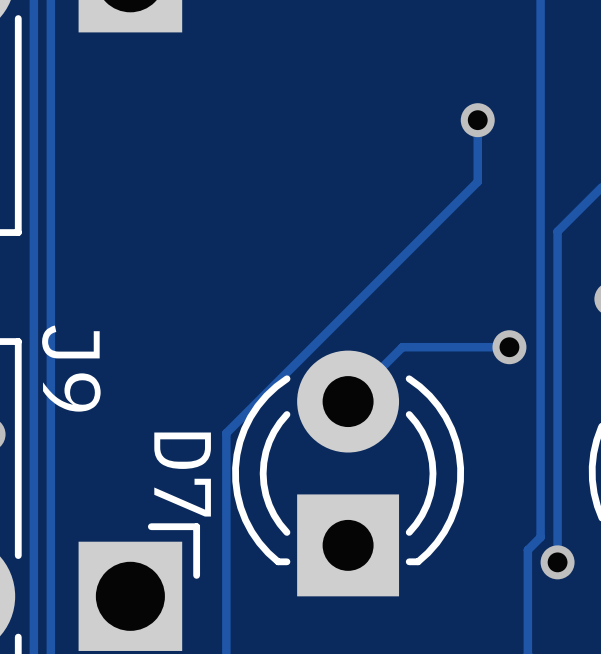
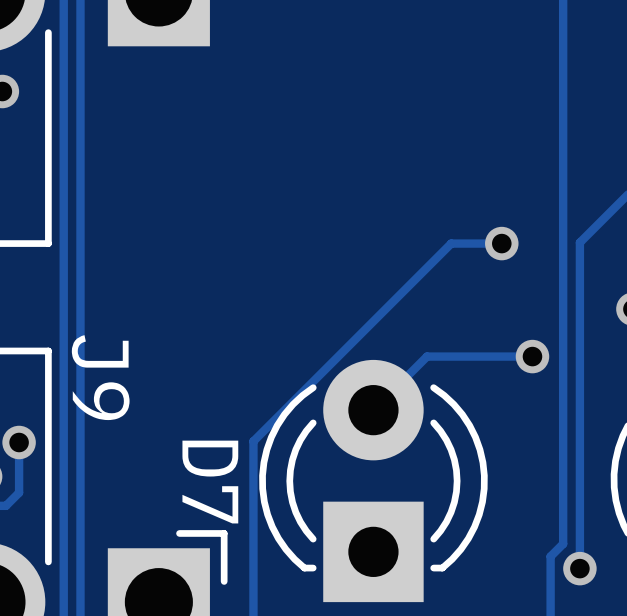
track: (477, 120) (477, 181) (427, 232) -> (501, 243) (451, 243)
via position: (477, 120) -> (501, 243)

